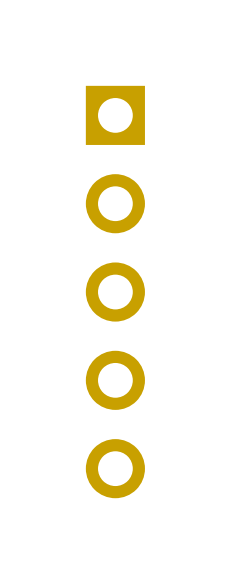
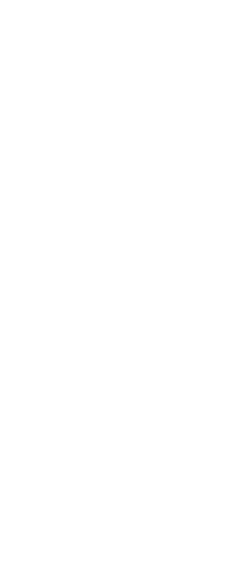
part: (115, 292) -> none

